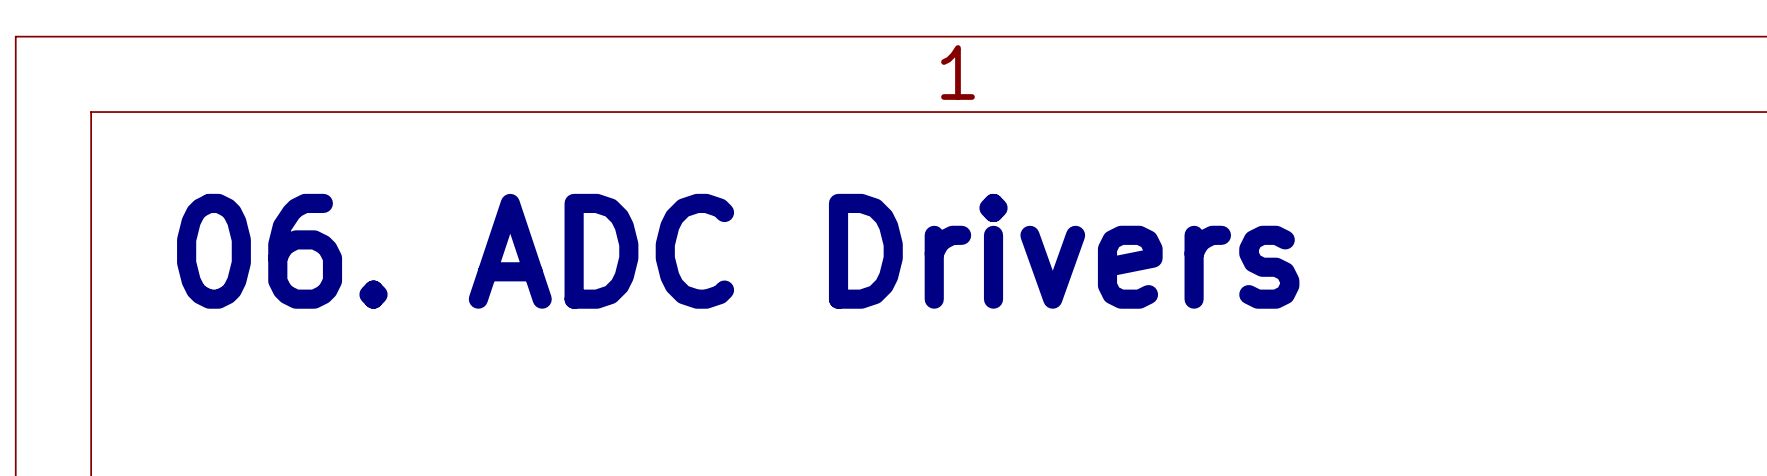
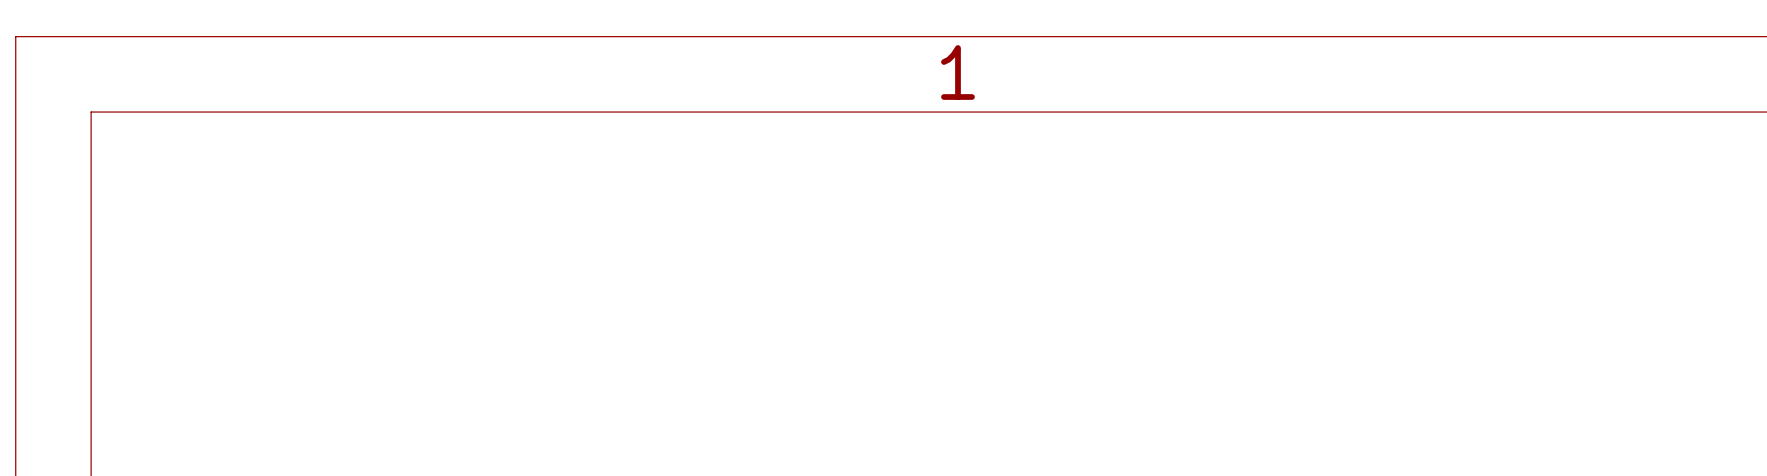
text: 06. ADC Drivers (738, 251) -> none

